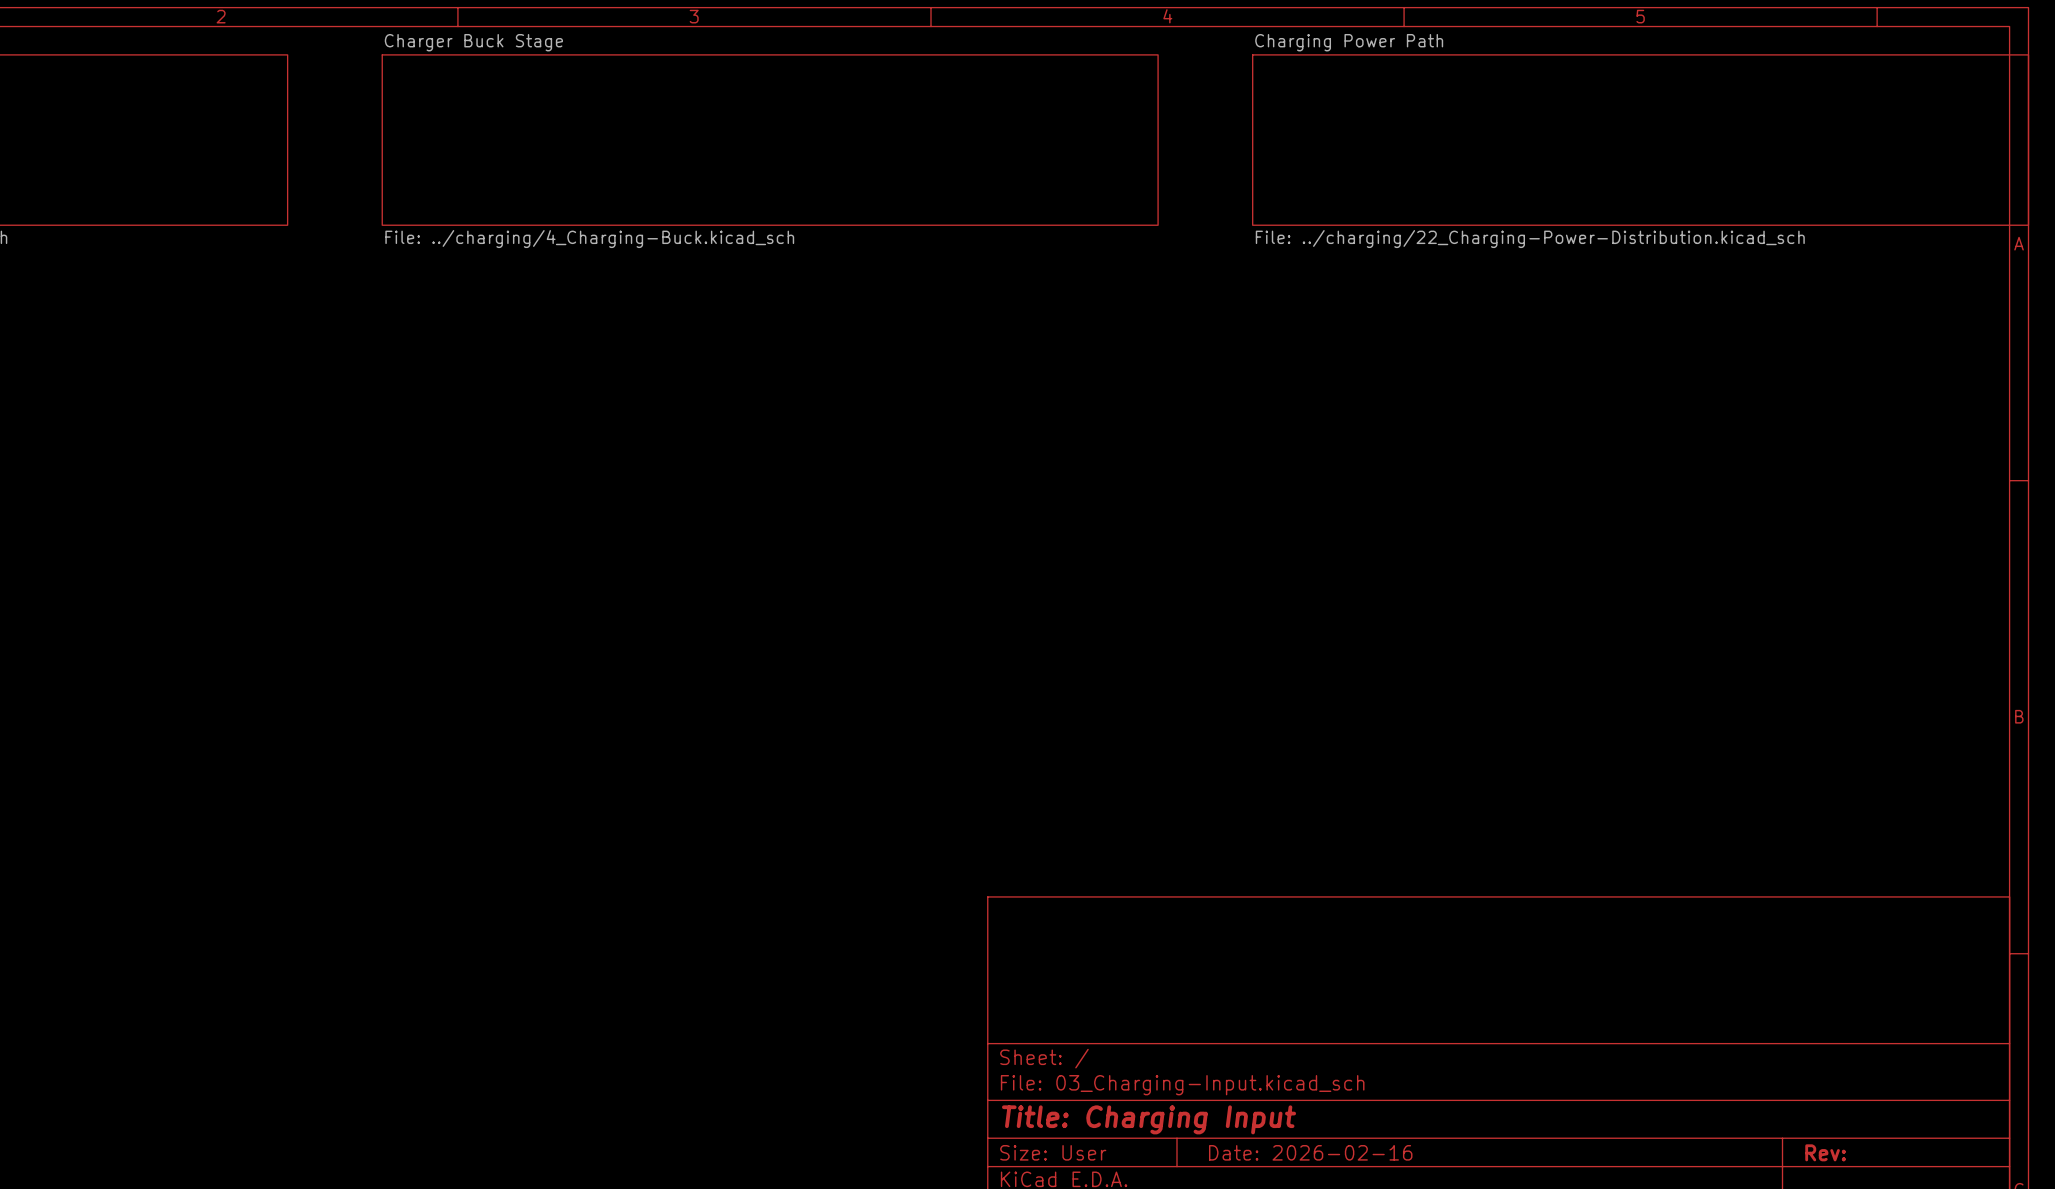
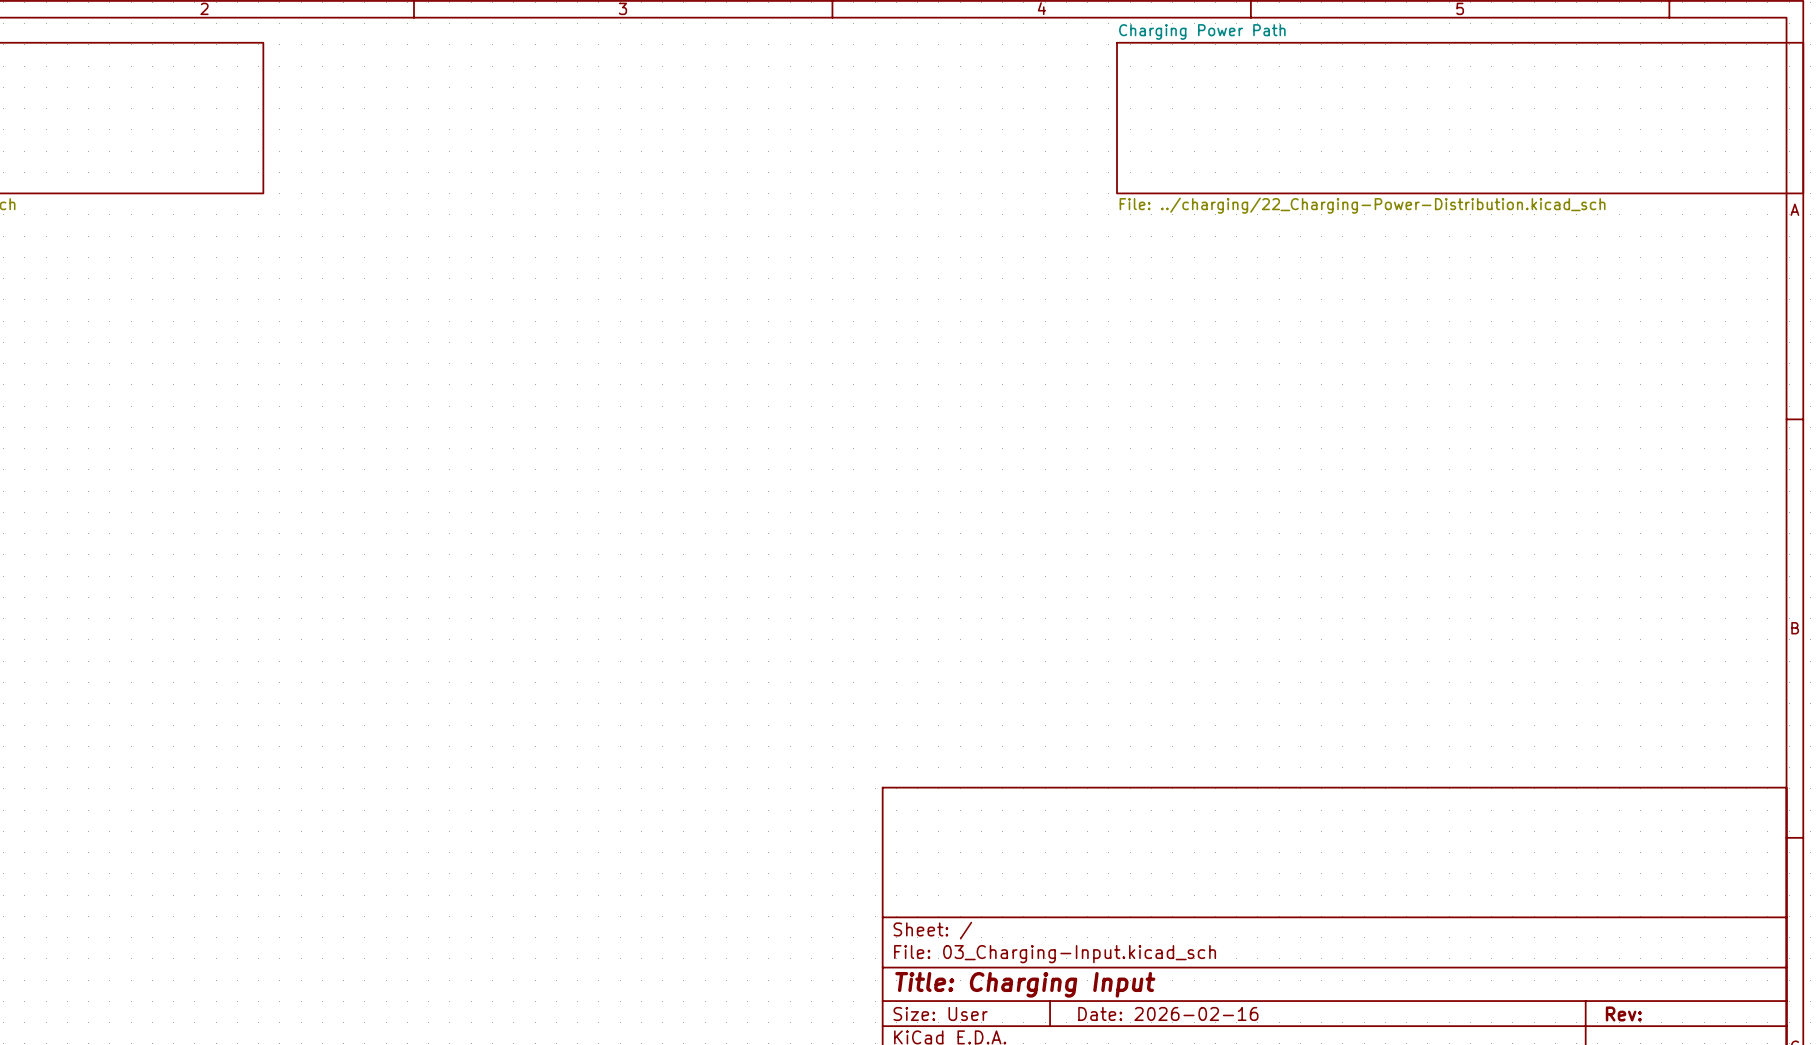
sheet Charger Buck Stage: File: ../charging/4_Charging-Buck.kicad_sch (770, 140) -> none

